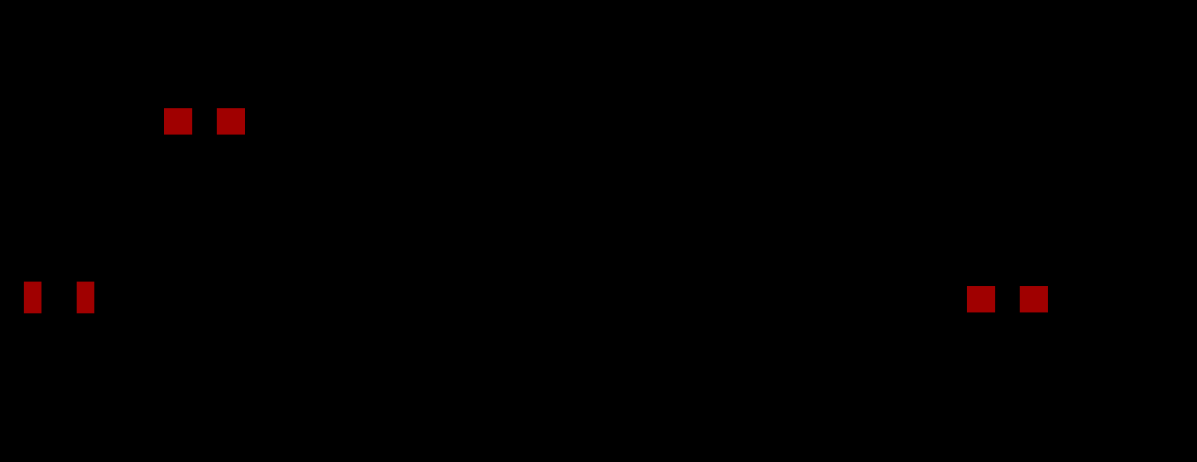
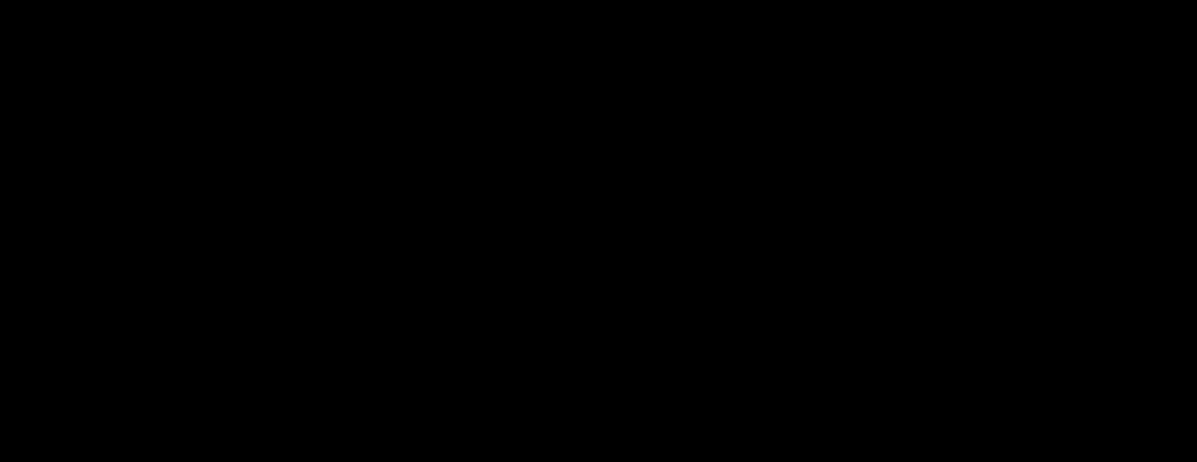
part: (204, 121) -> none
part: (59, 297) -> none
part: (1007, 299) -> none

